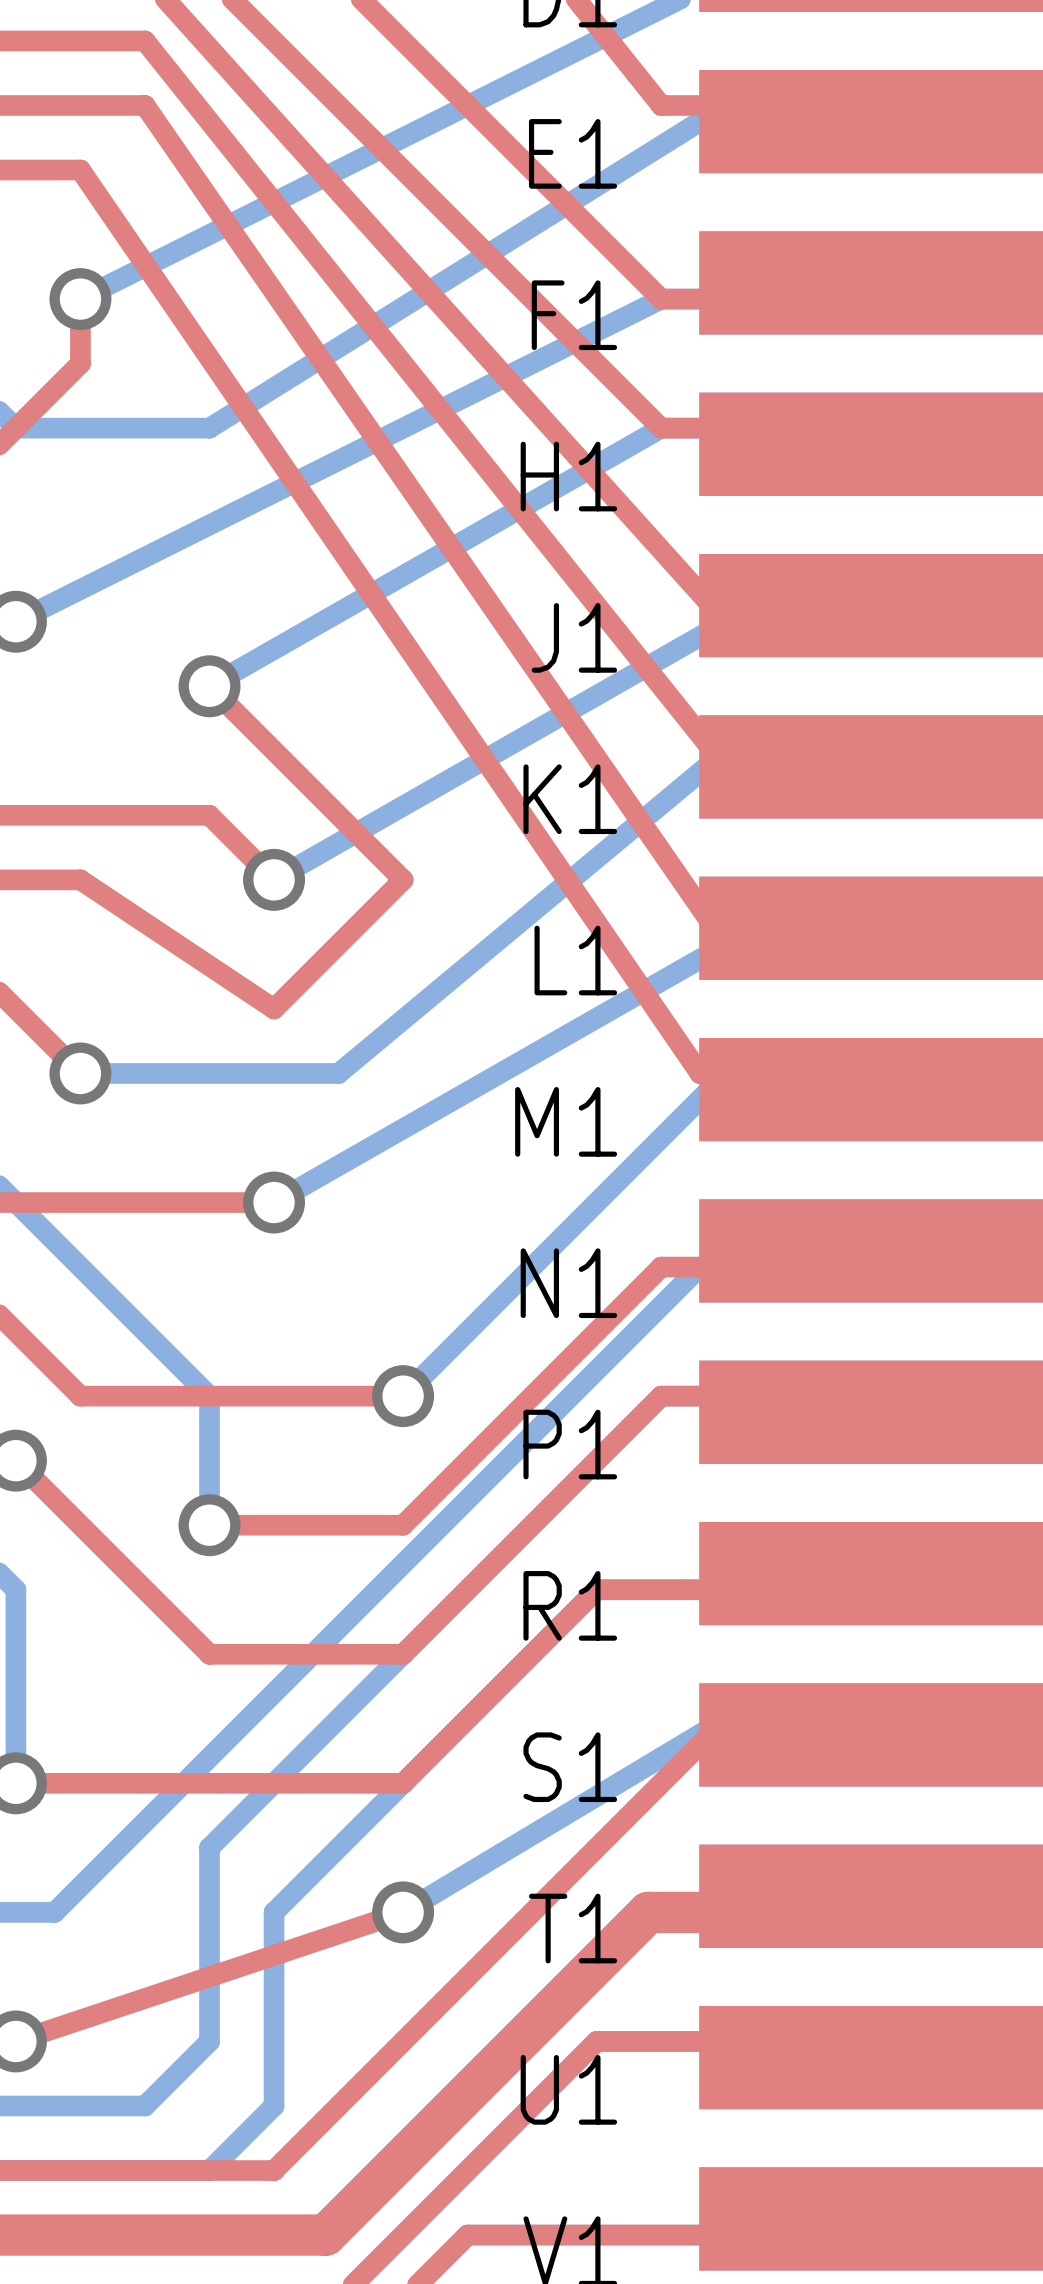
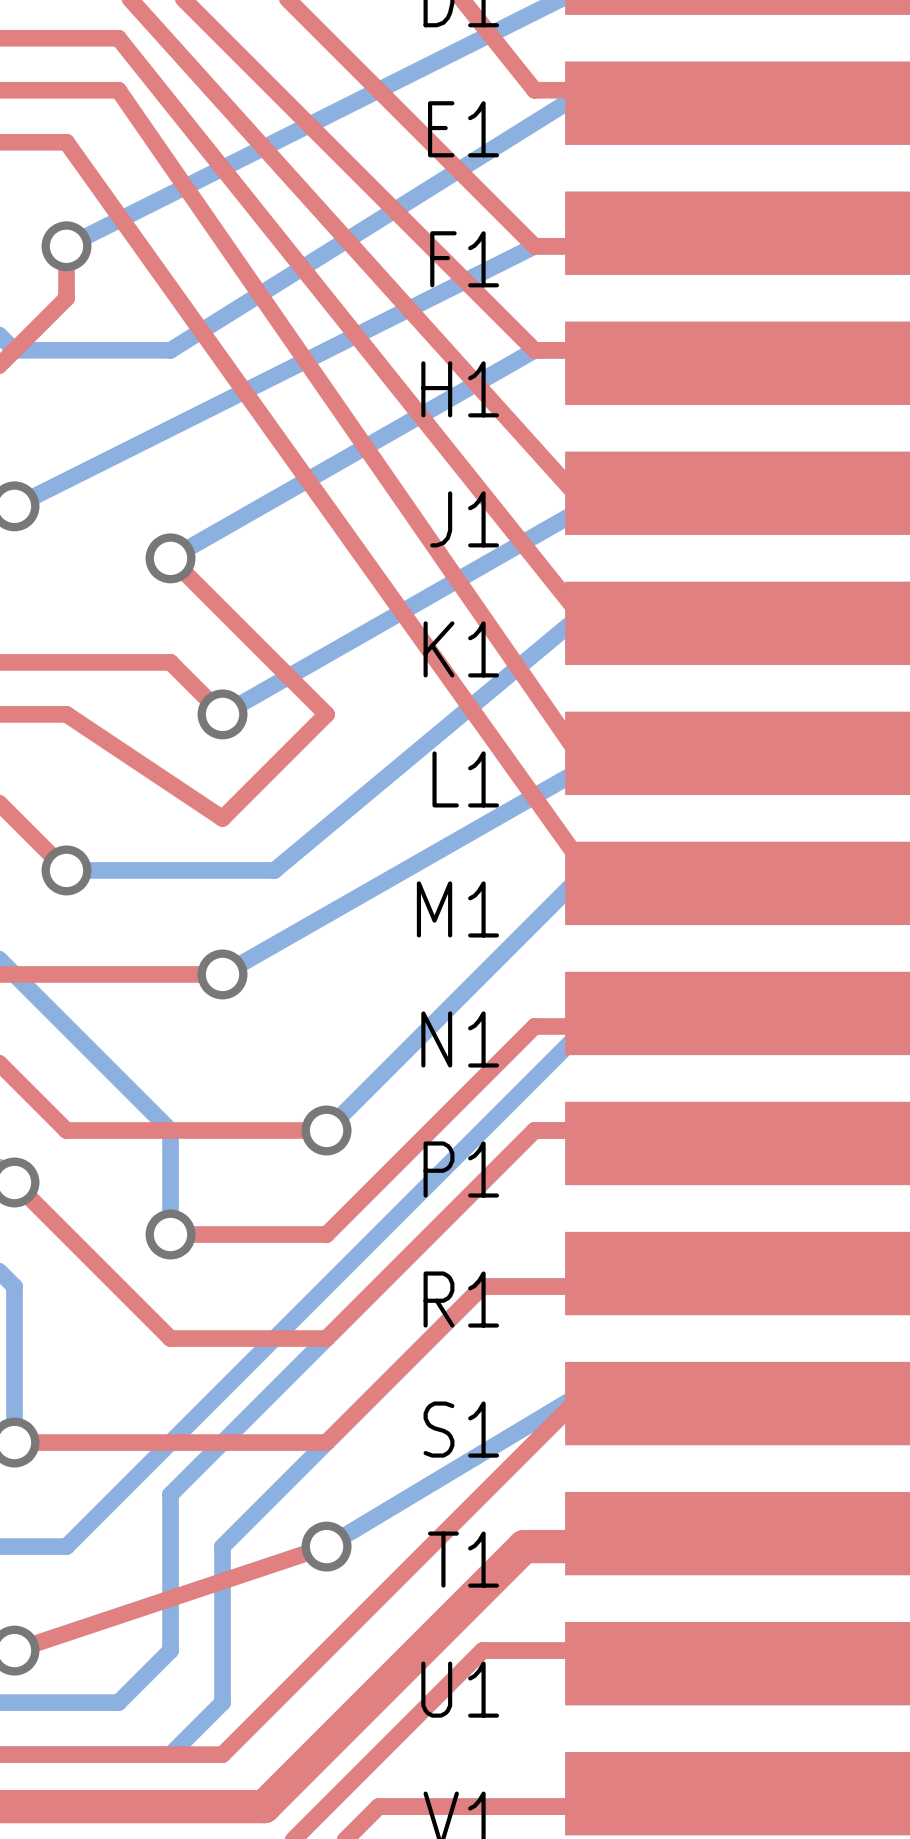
top track: (80, 170) (699, 1073) (725, 1073) -> (66, 142) (586, 870)
bottom track: (725, 1267) (699, 1267) (54, 1912) -> (586, 1026) (66, 1546) (45, 1546)

